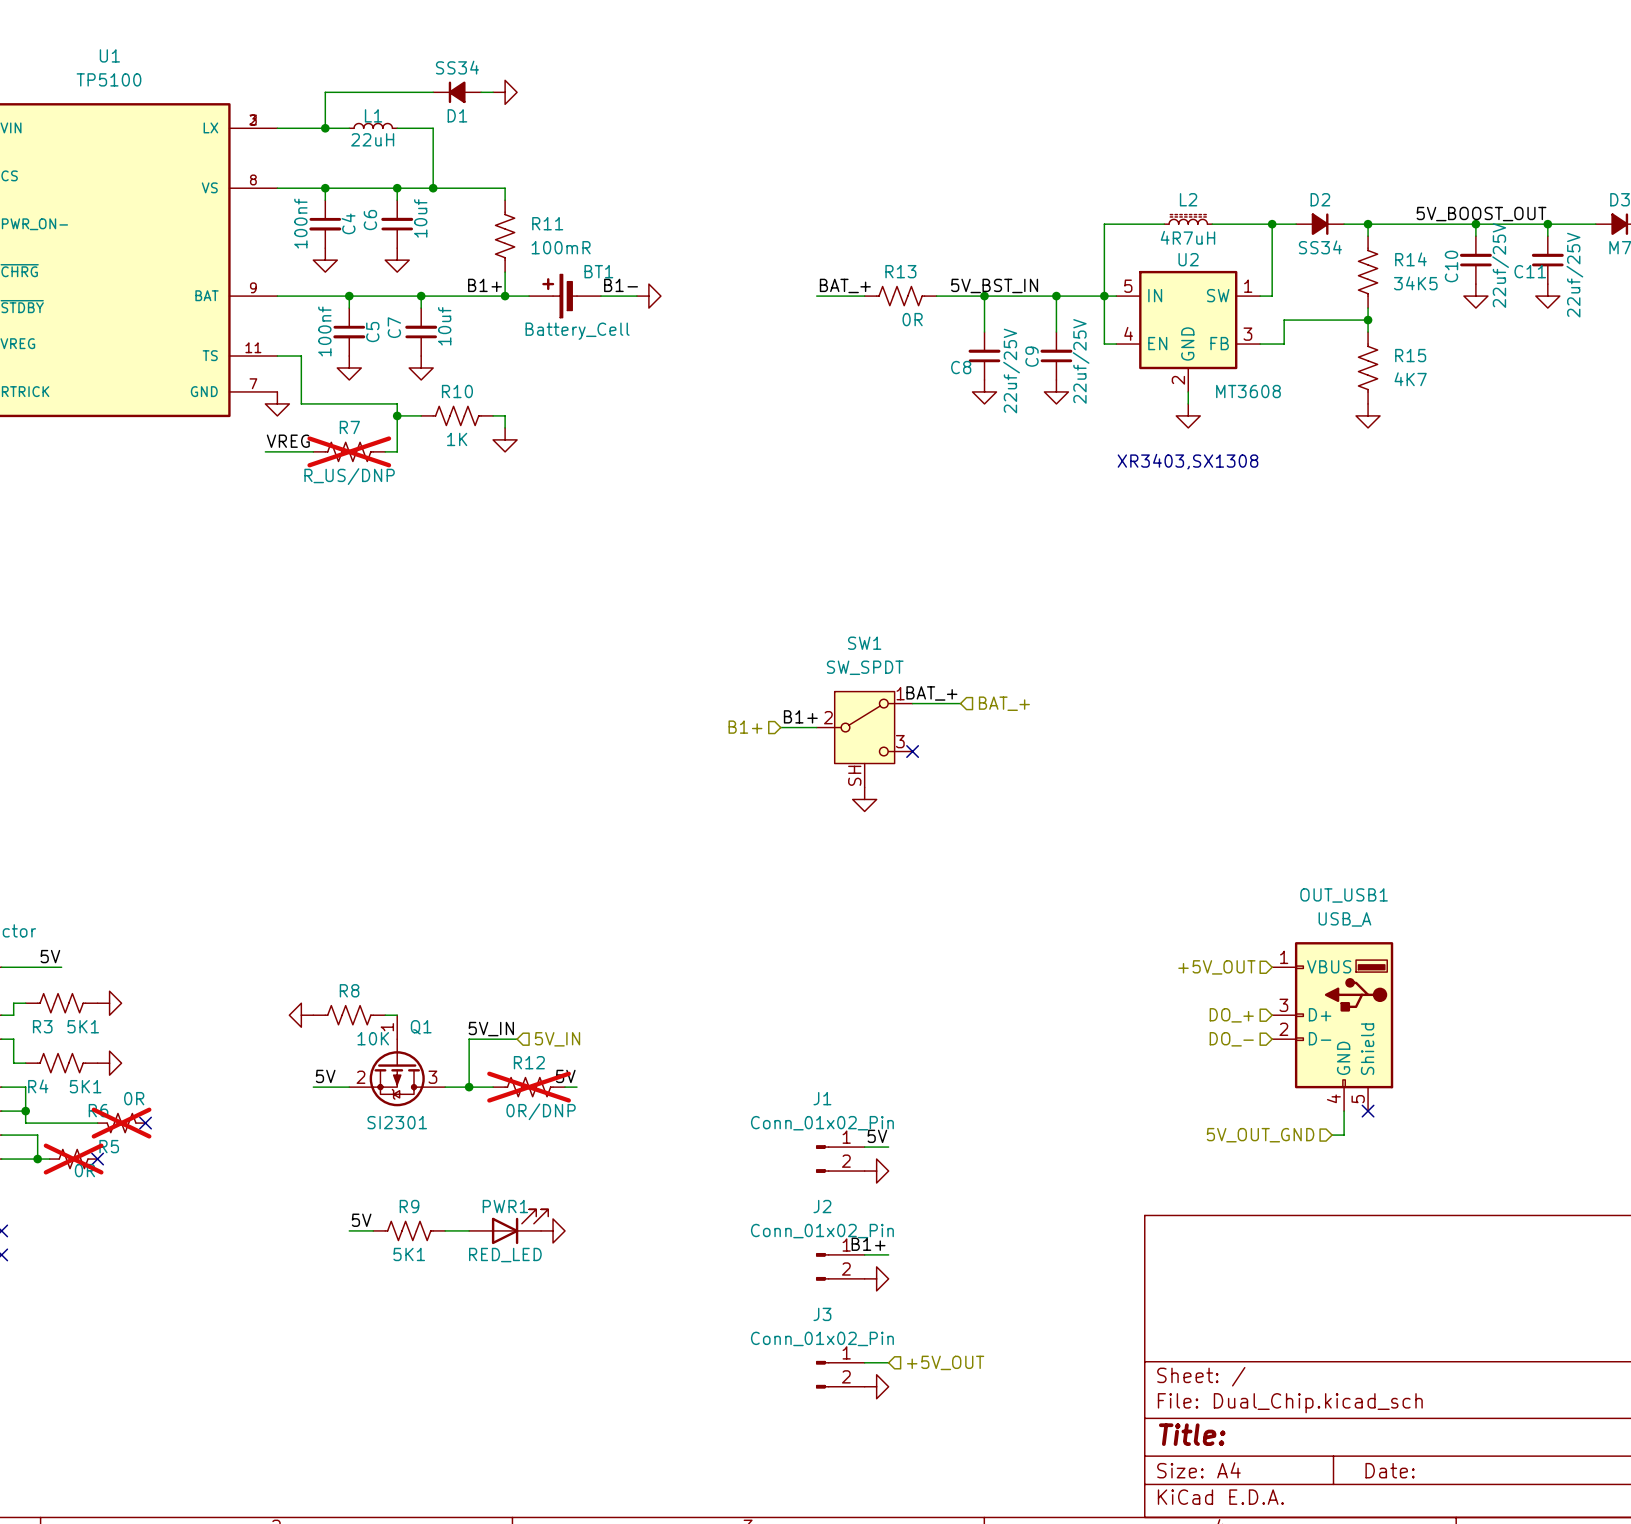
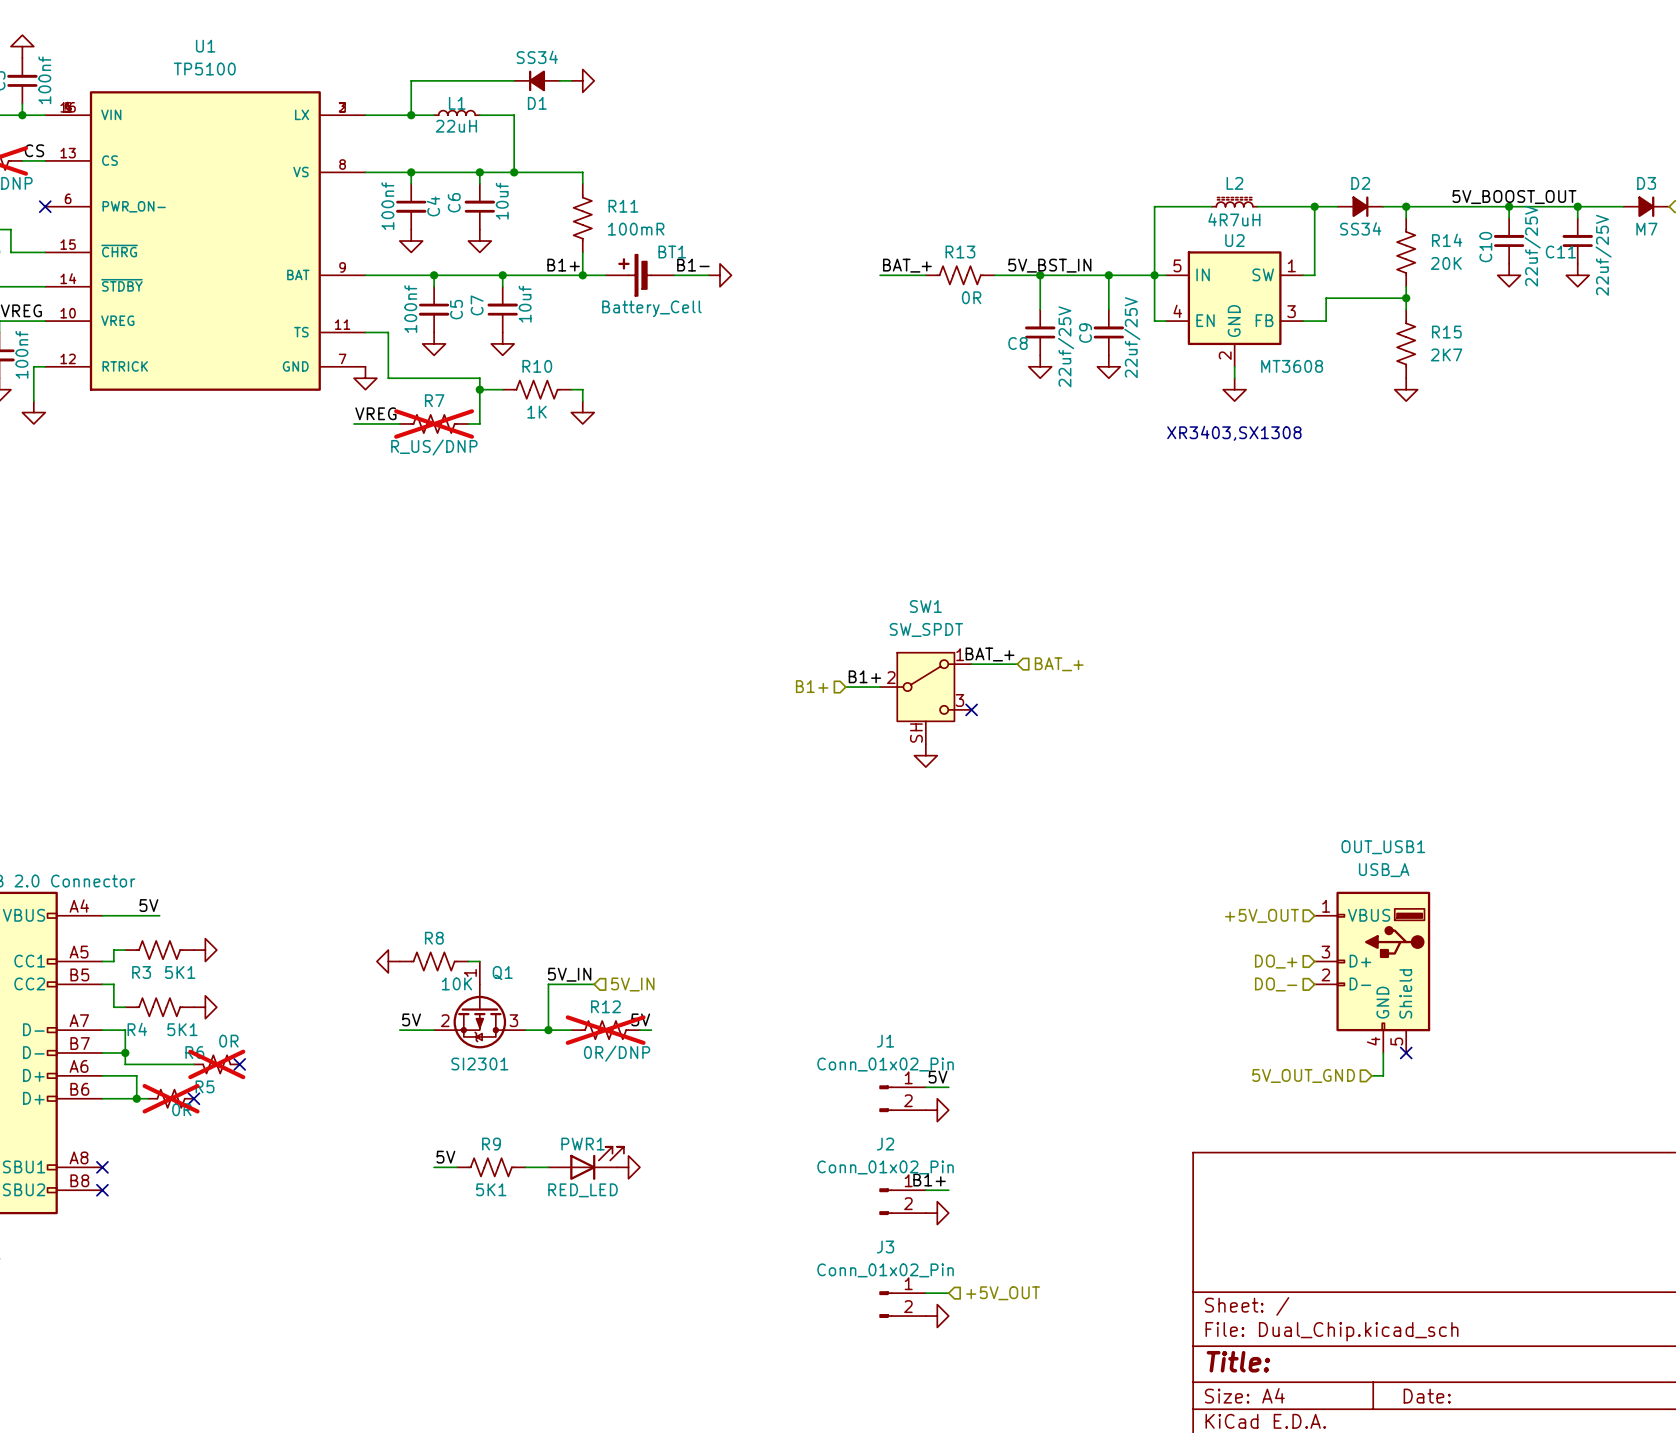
R14 value: 34K5 (1415, 283) -> 20K (1446, 263)
R15 value: 4K7 (1410, 379) -> 2K7 (1446, 354)

